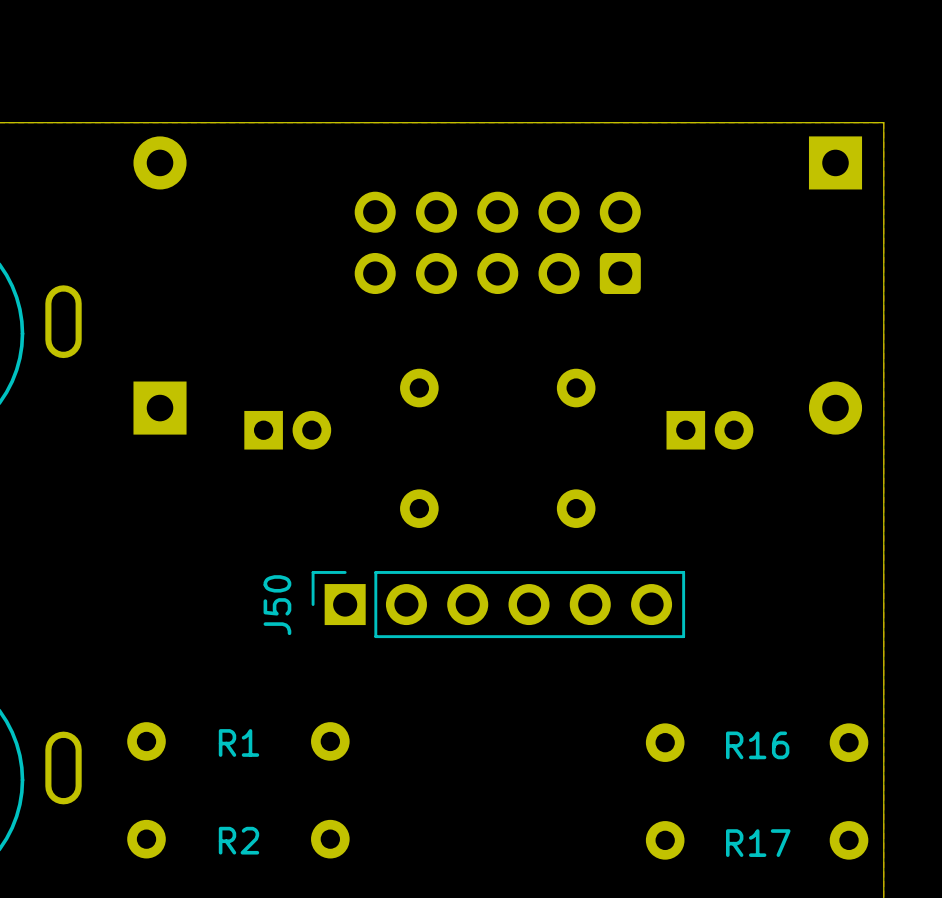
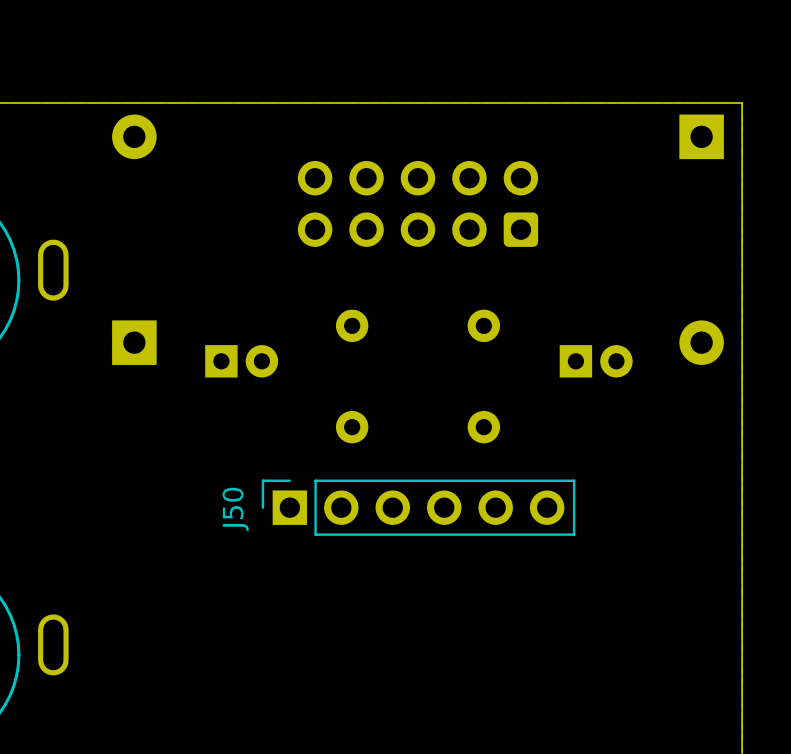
R1: (238, 741) -> none
R16: (757, 742) -> none
R2: (238, 839) -> none
R17: (757, 840) -> none

